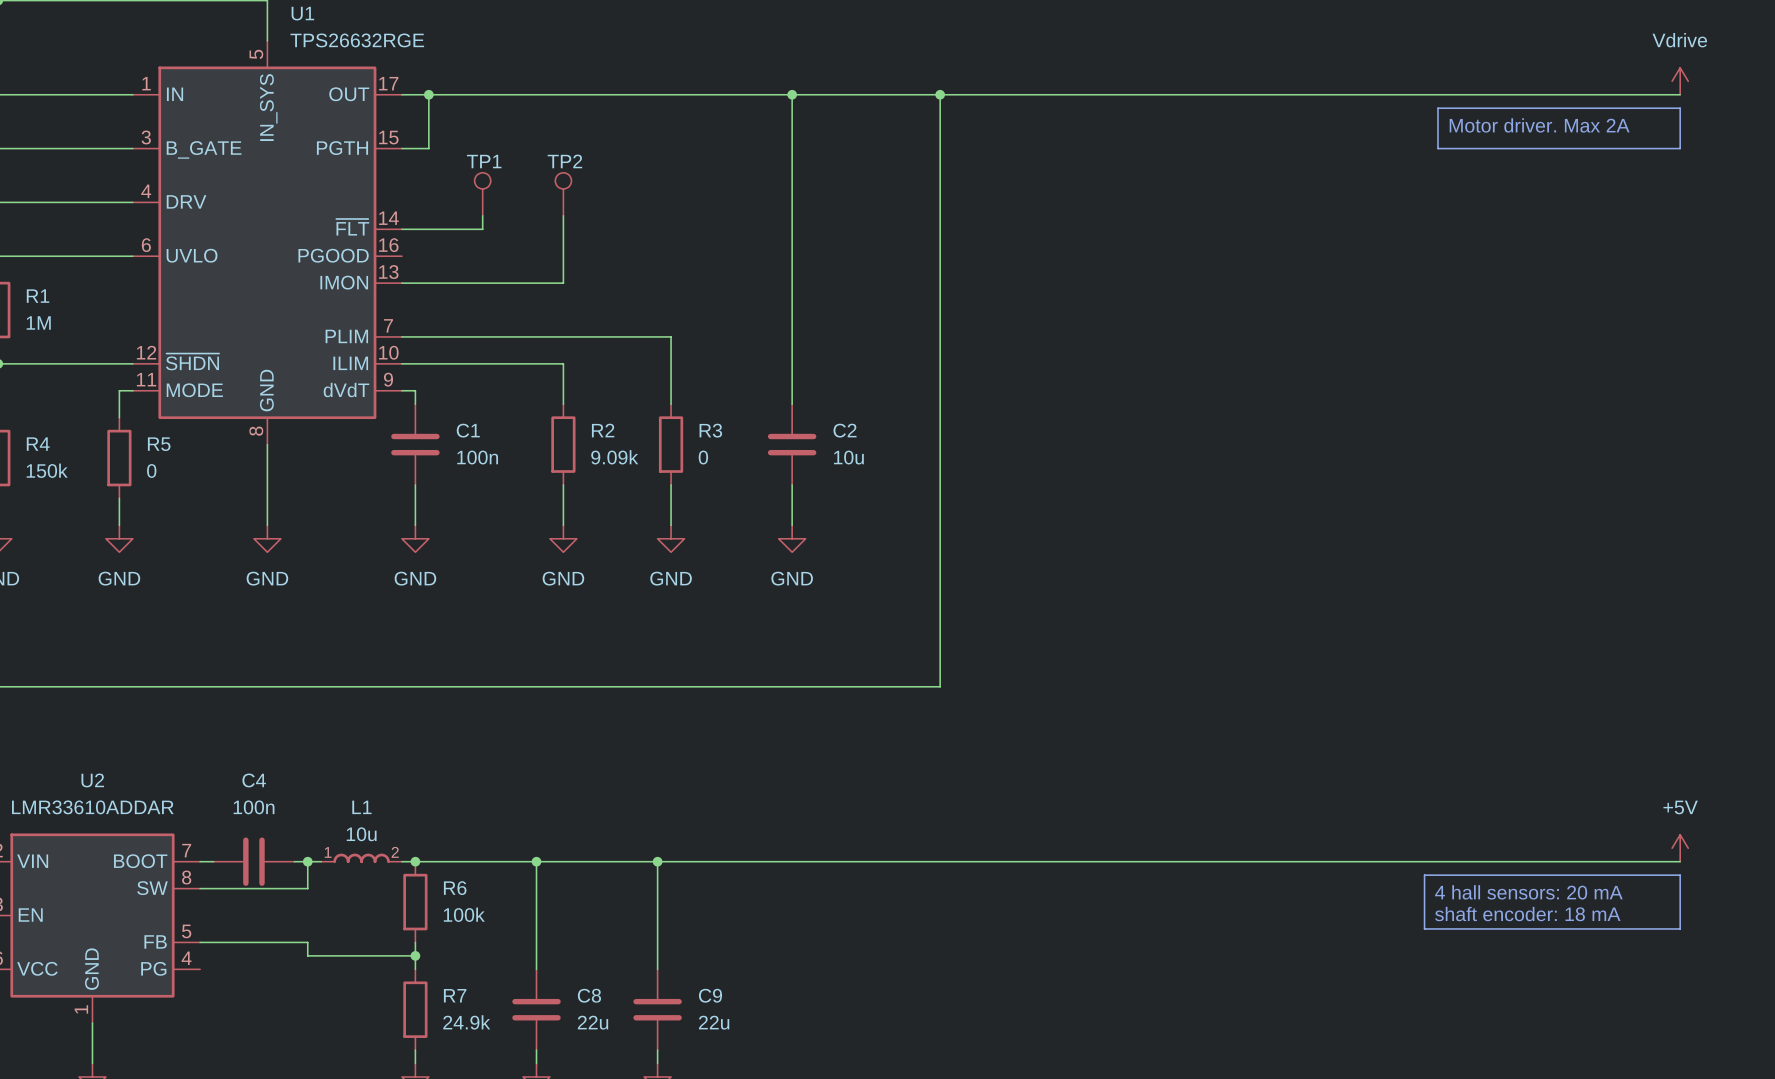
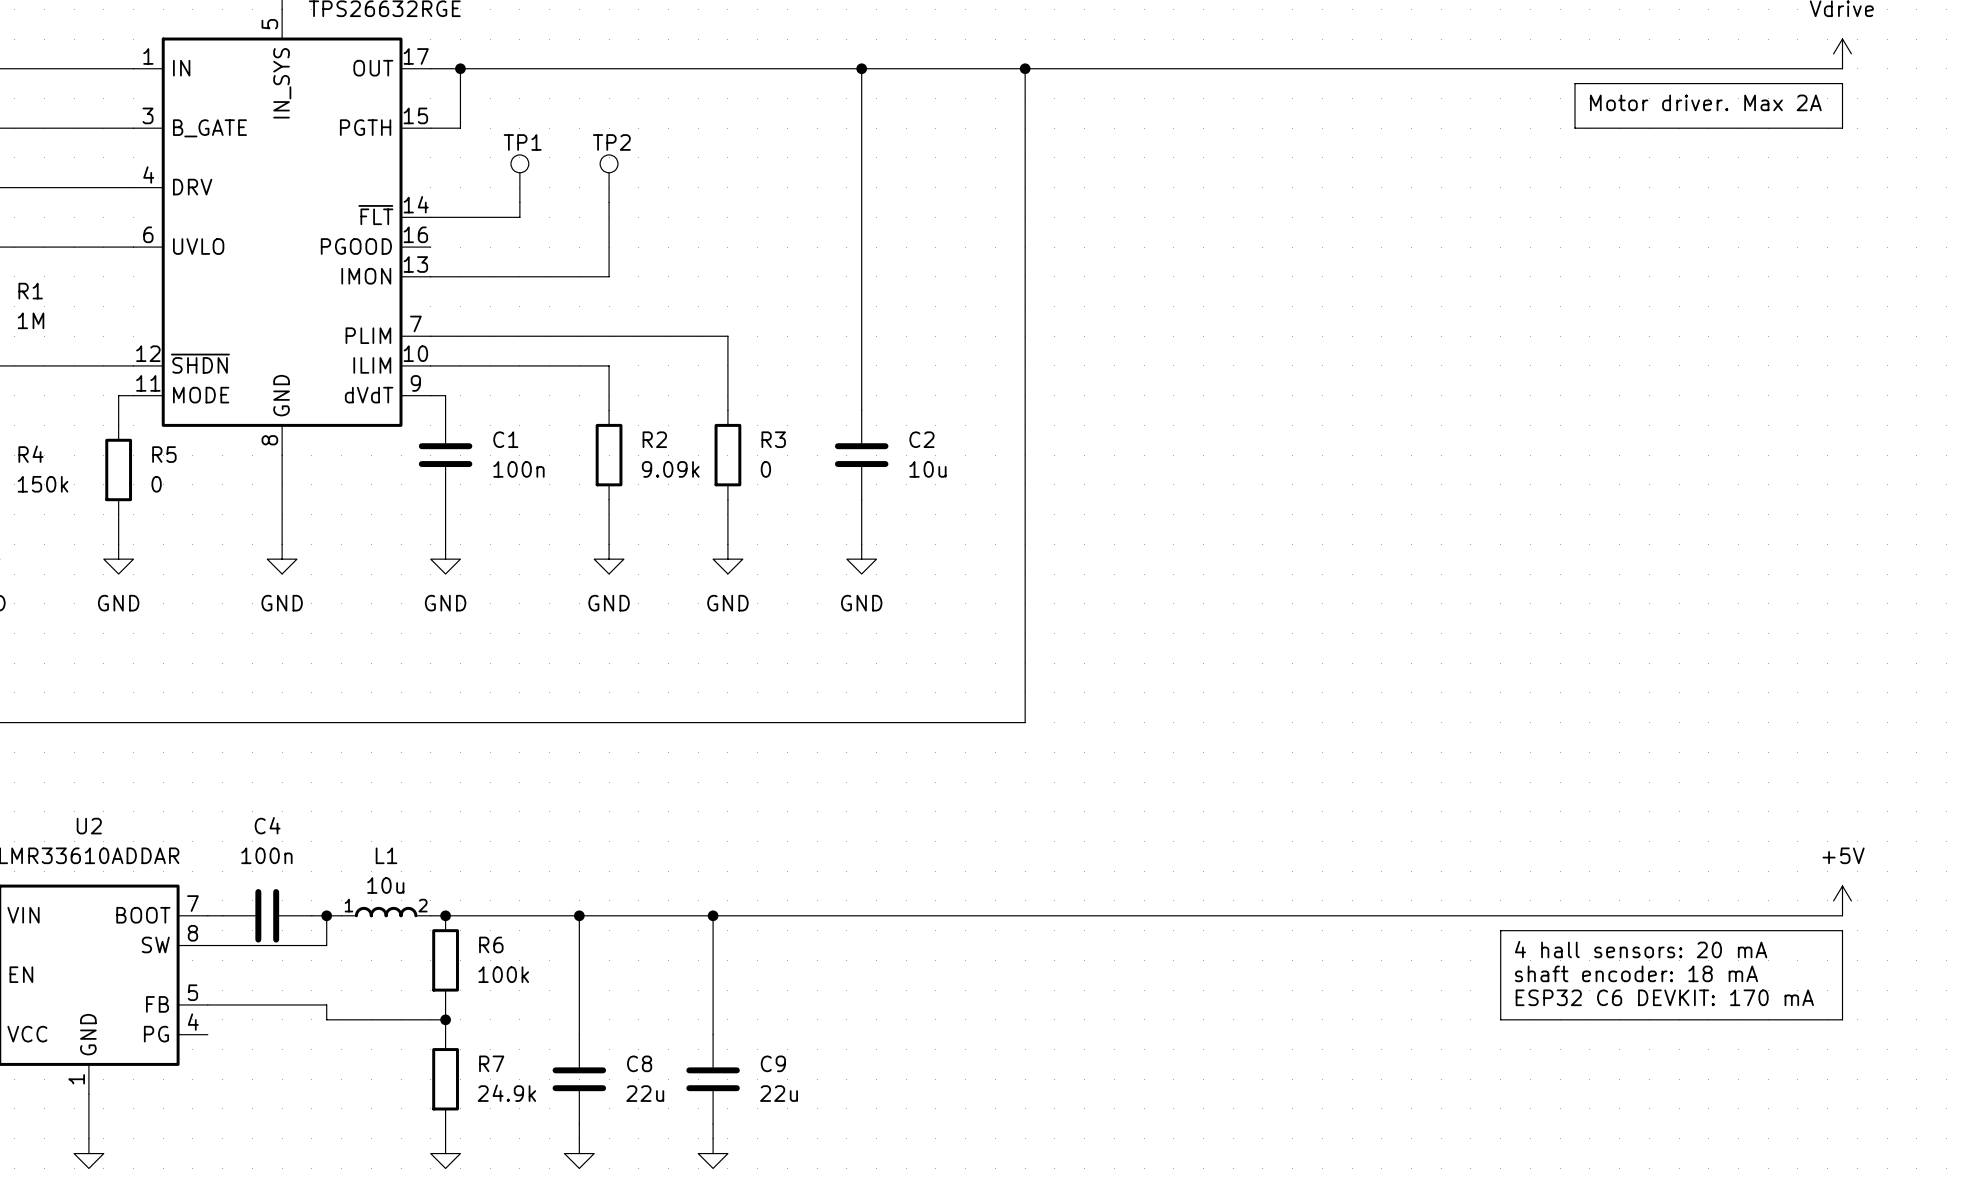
line: (1424, 875) (1424, 928) (1680, 928) -> (1560, 930) (1500, 930) (1500, 1019) (1842, 1019) (1842, 990)
text position: 4 hall sensors: 20 mA (1528, 892) -> 4 hall sensors: 20 mA (1641, 949)
text position: shaft encoder: 18 mA (1527, 914) -> shaft encoder: 18 mA (1636, 973)
text: none -> ESP32 C6 DEVKIT: 170 mA (1664, 997)

